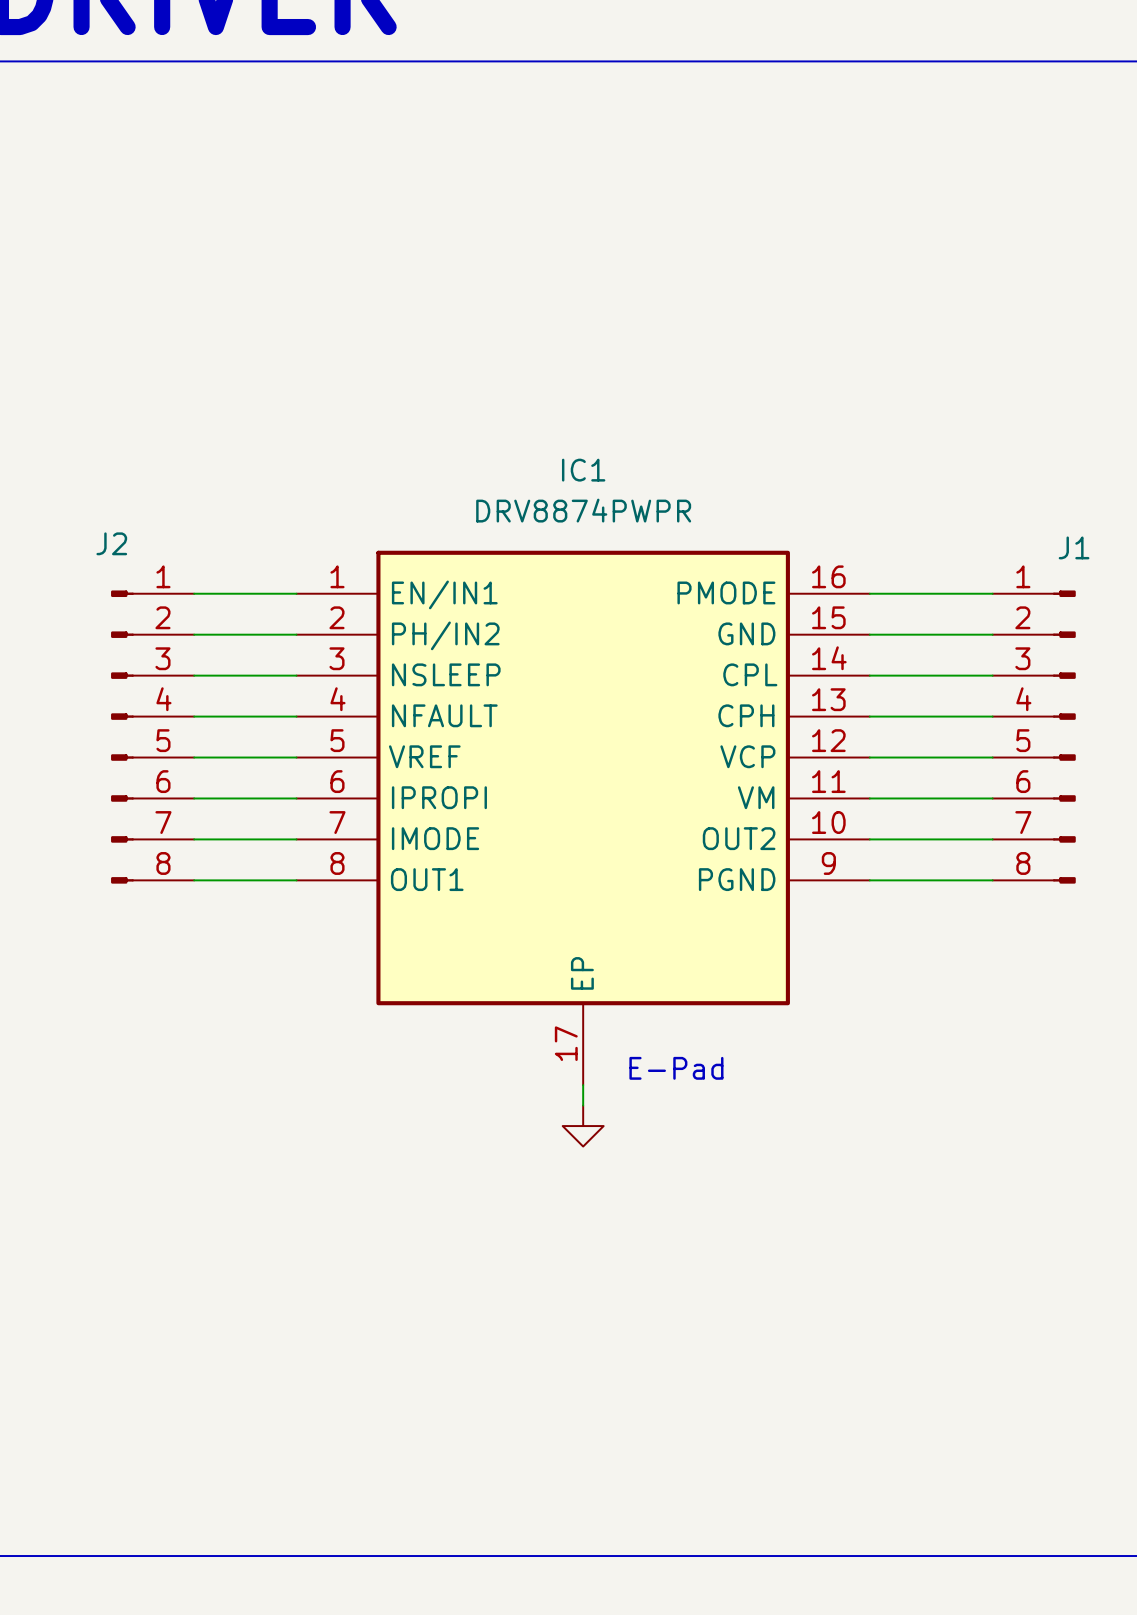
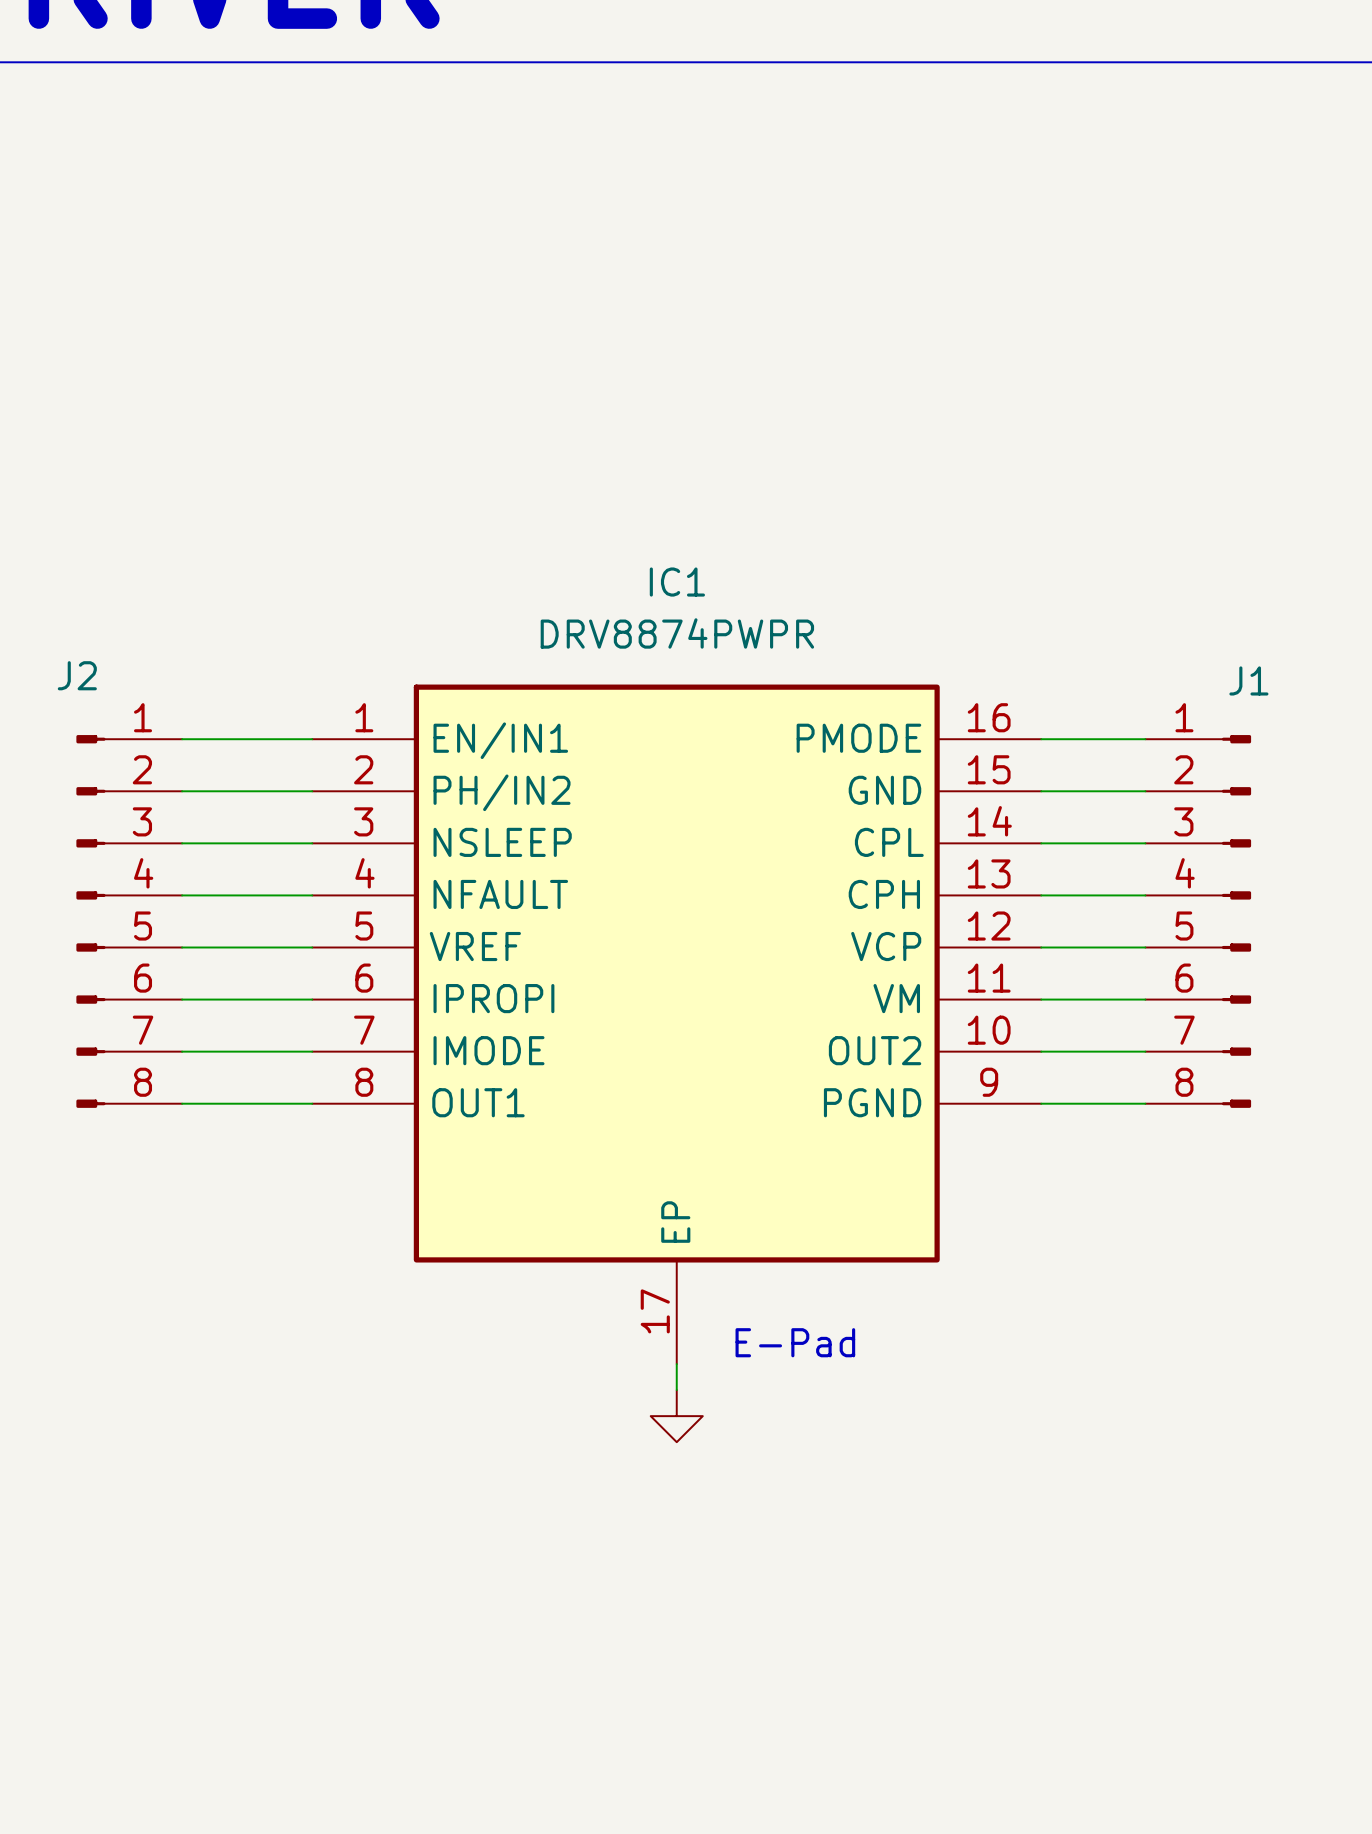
J1 position: (1034, 737) -> (1198, 921)

